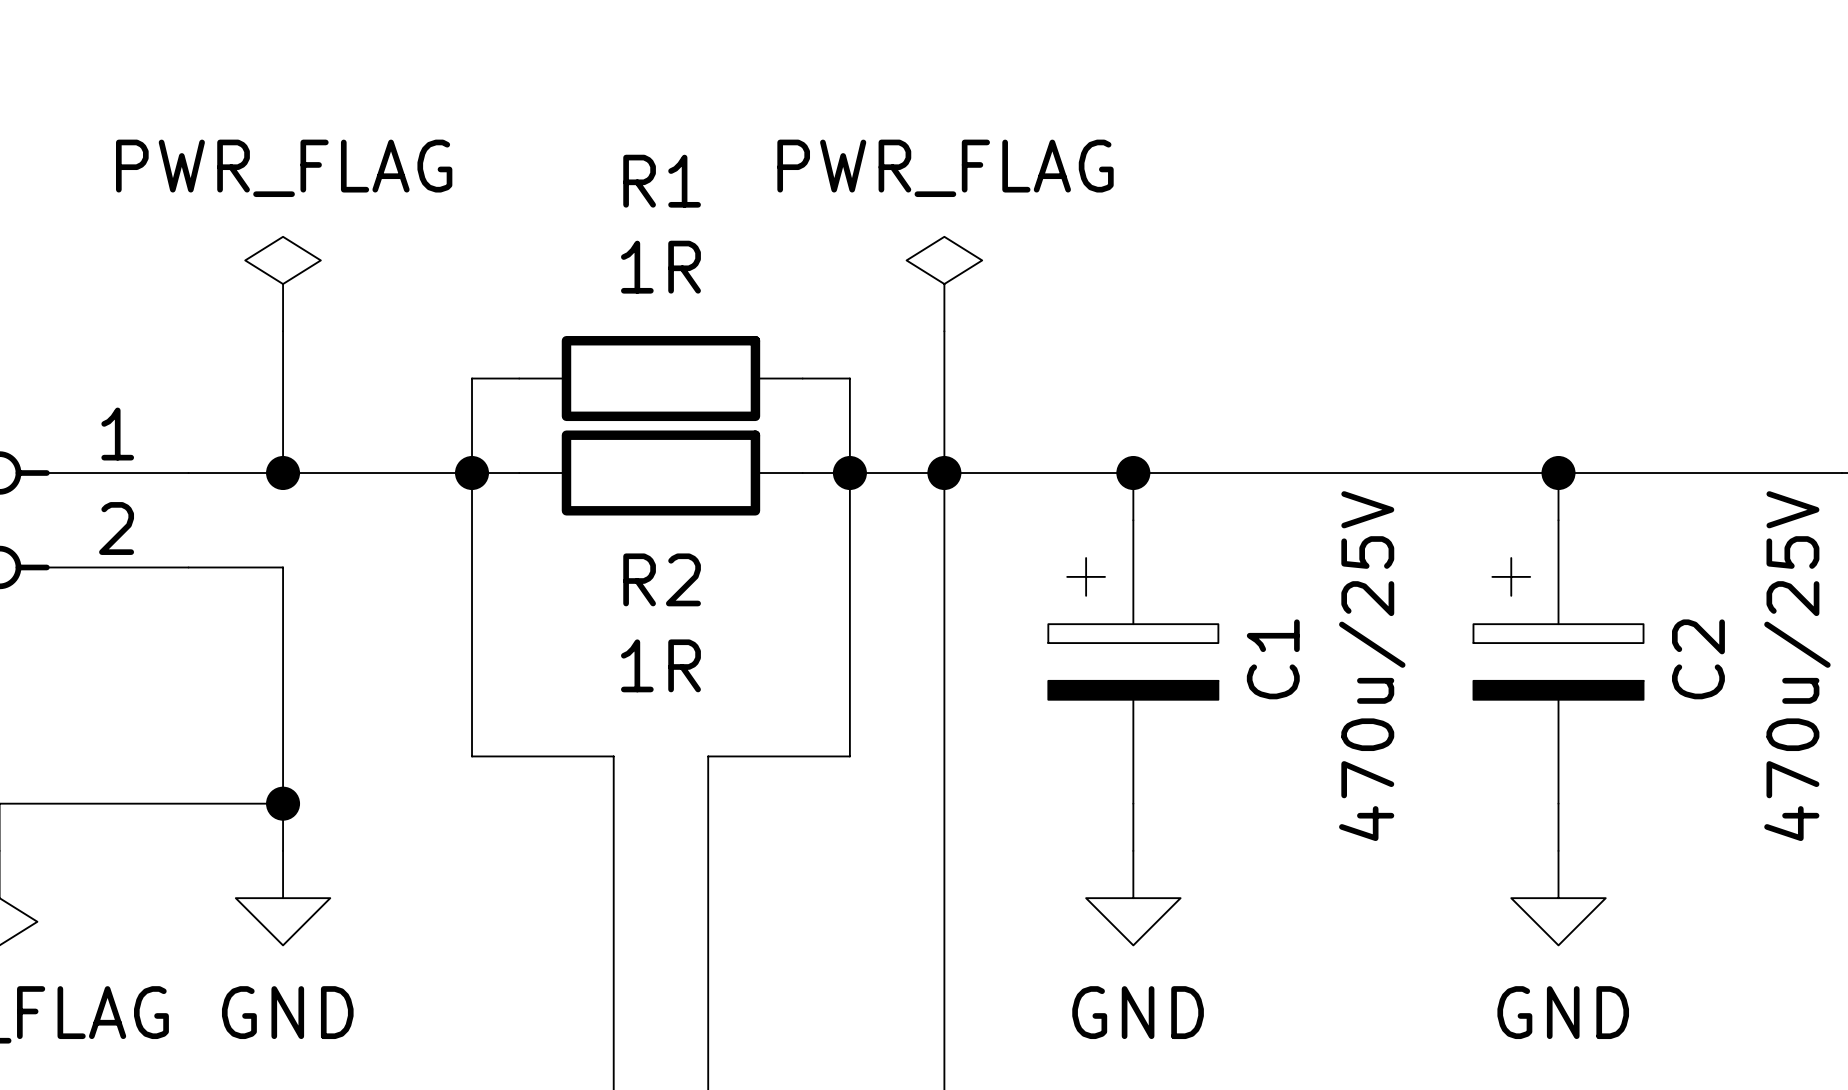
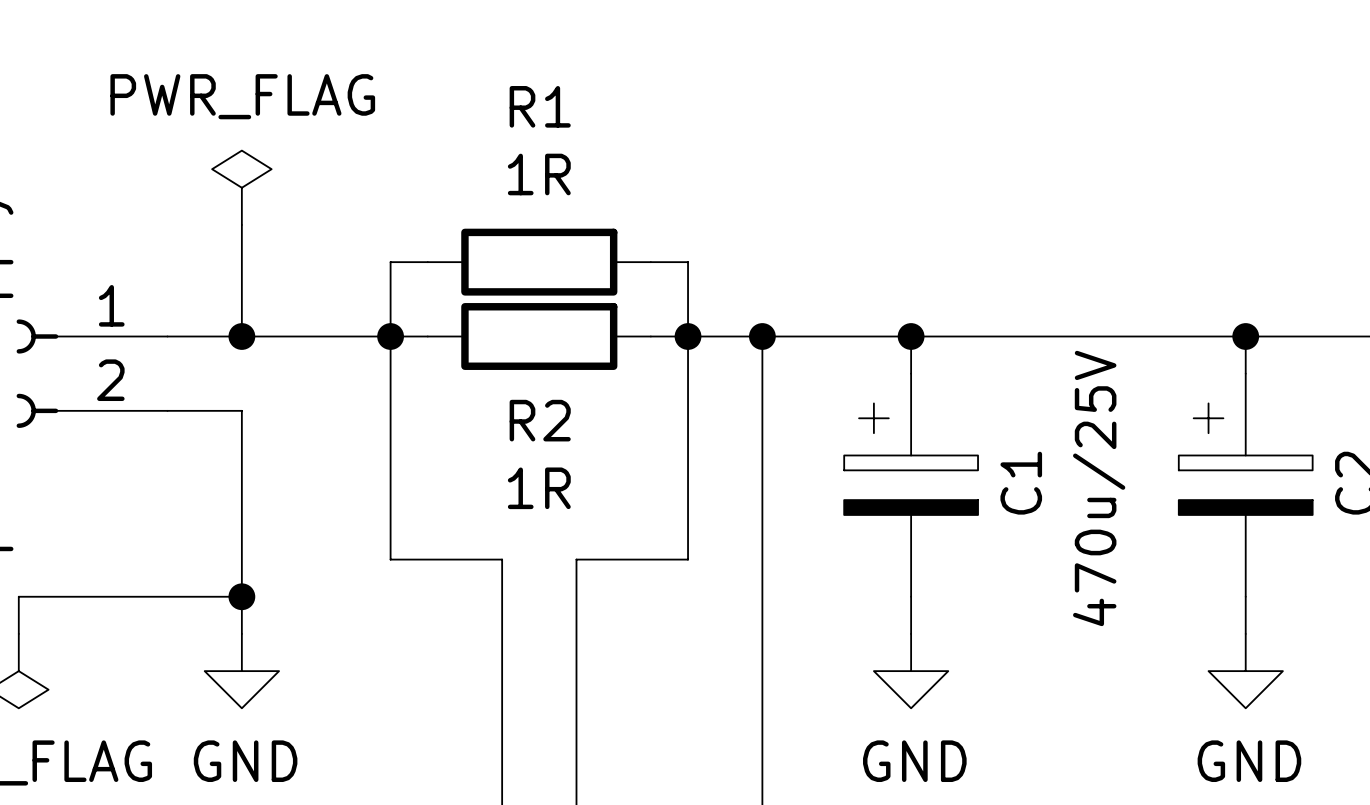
power symbol: PWR_FLAG (944, 284) -> none
wire: (944, 331) (944, 473) -> none

